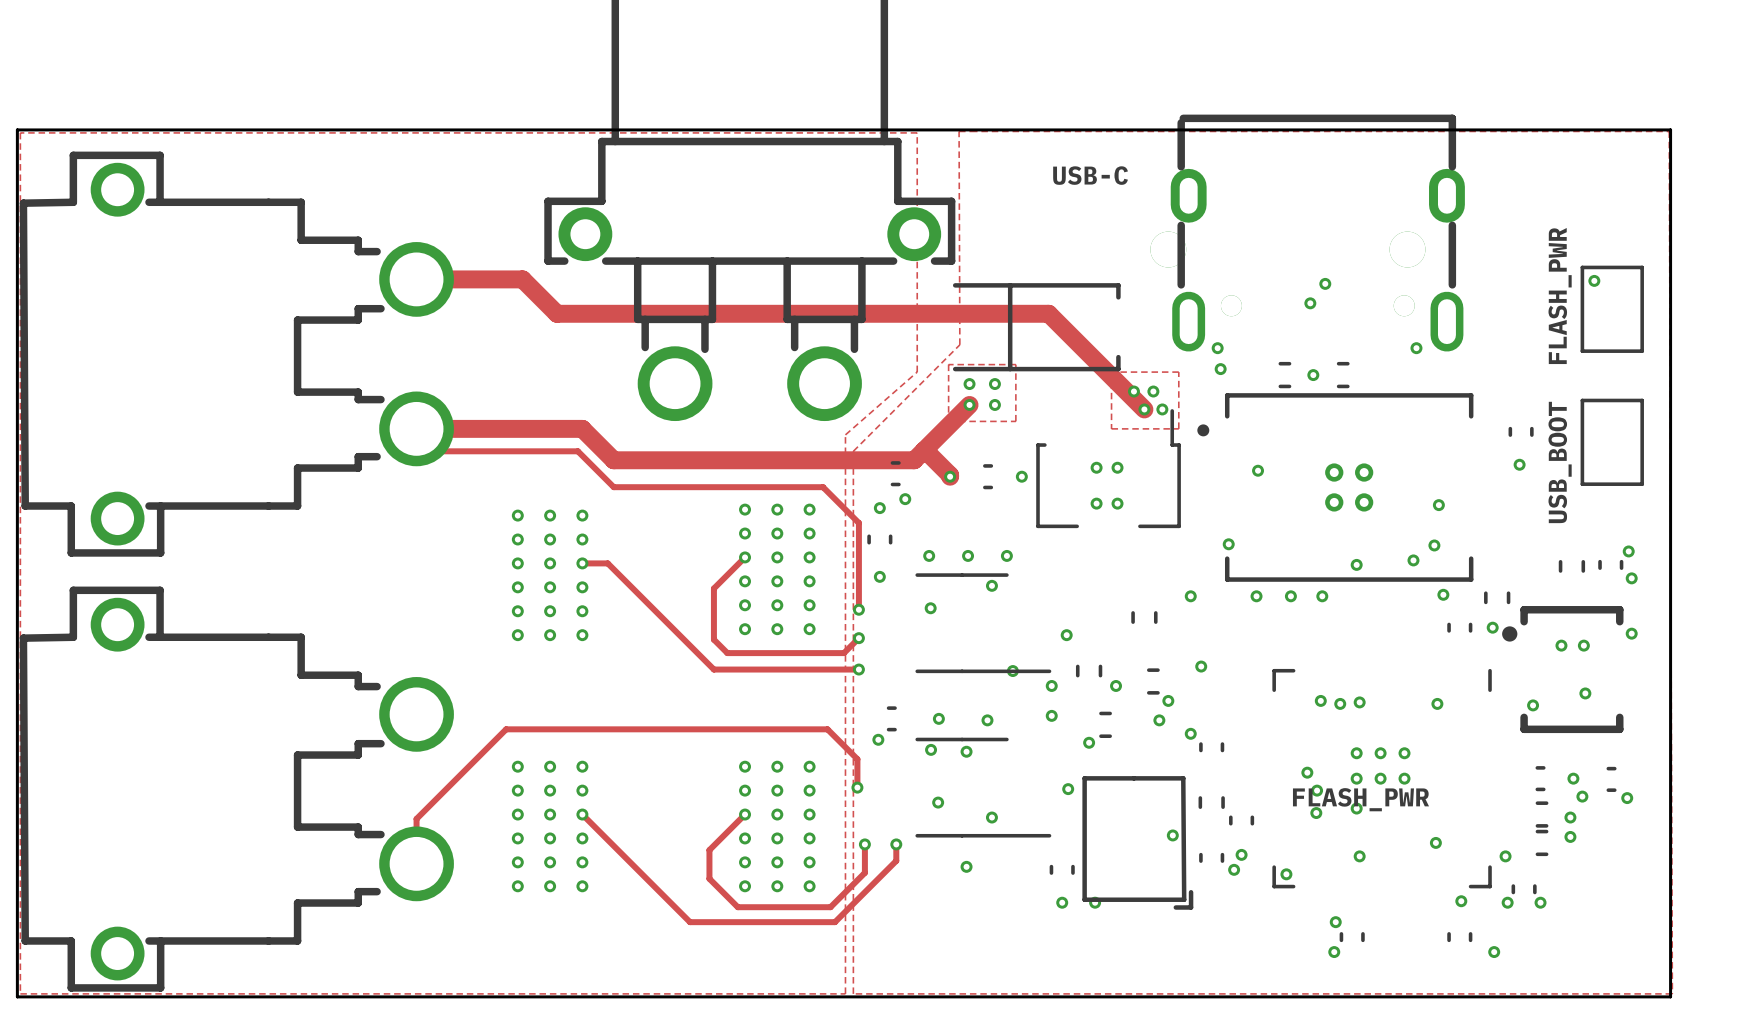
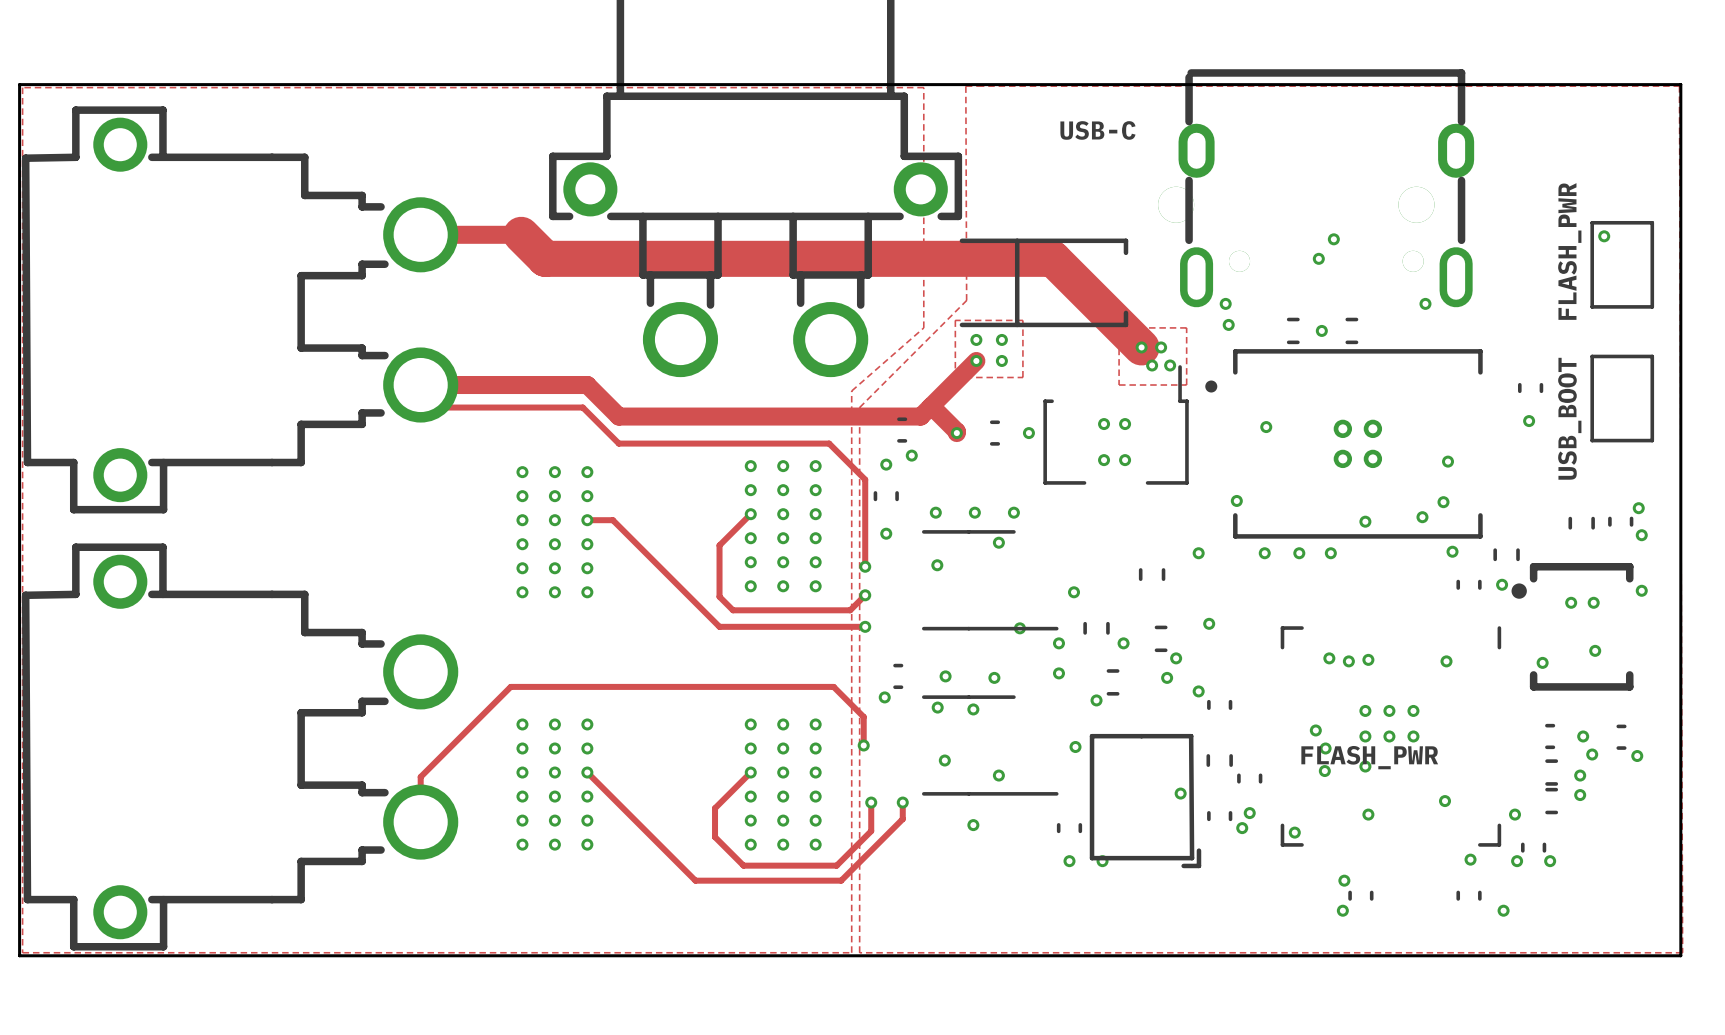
track: (516, 279) (522, 279) (556, 313) (1048, 313) (1144, 409) -> (521, 234) (545, 258) (1052, 258) (1141, 347)

